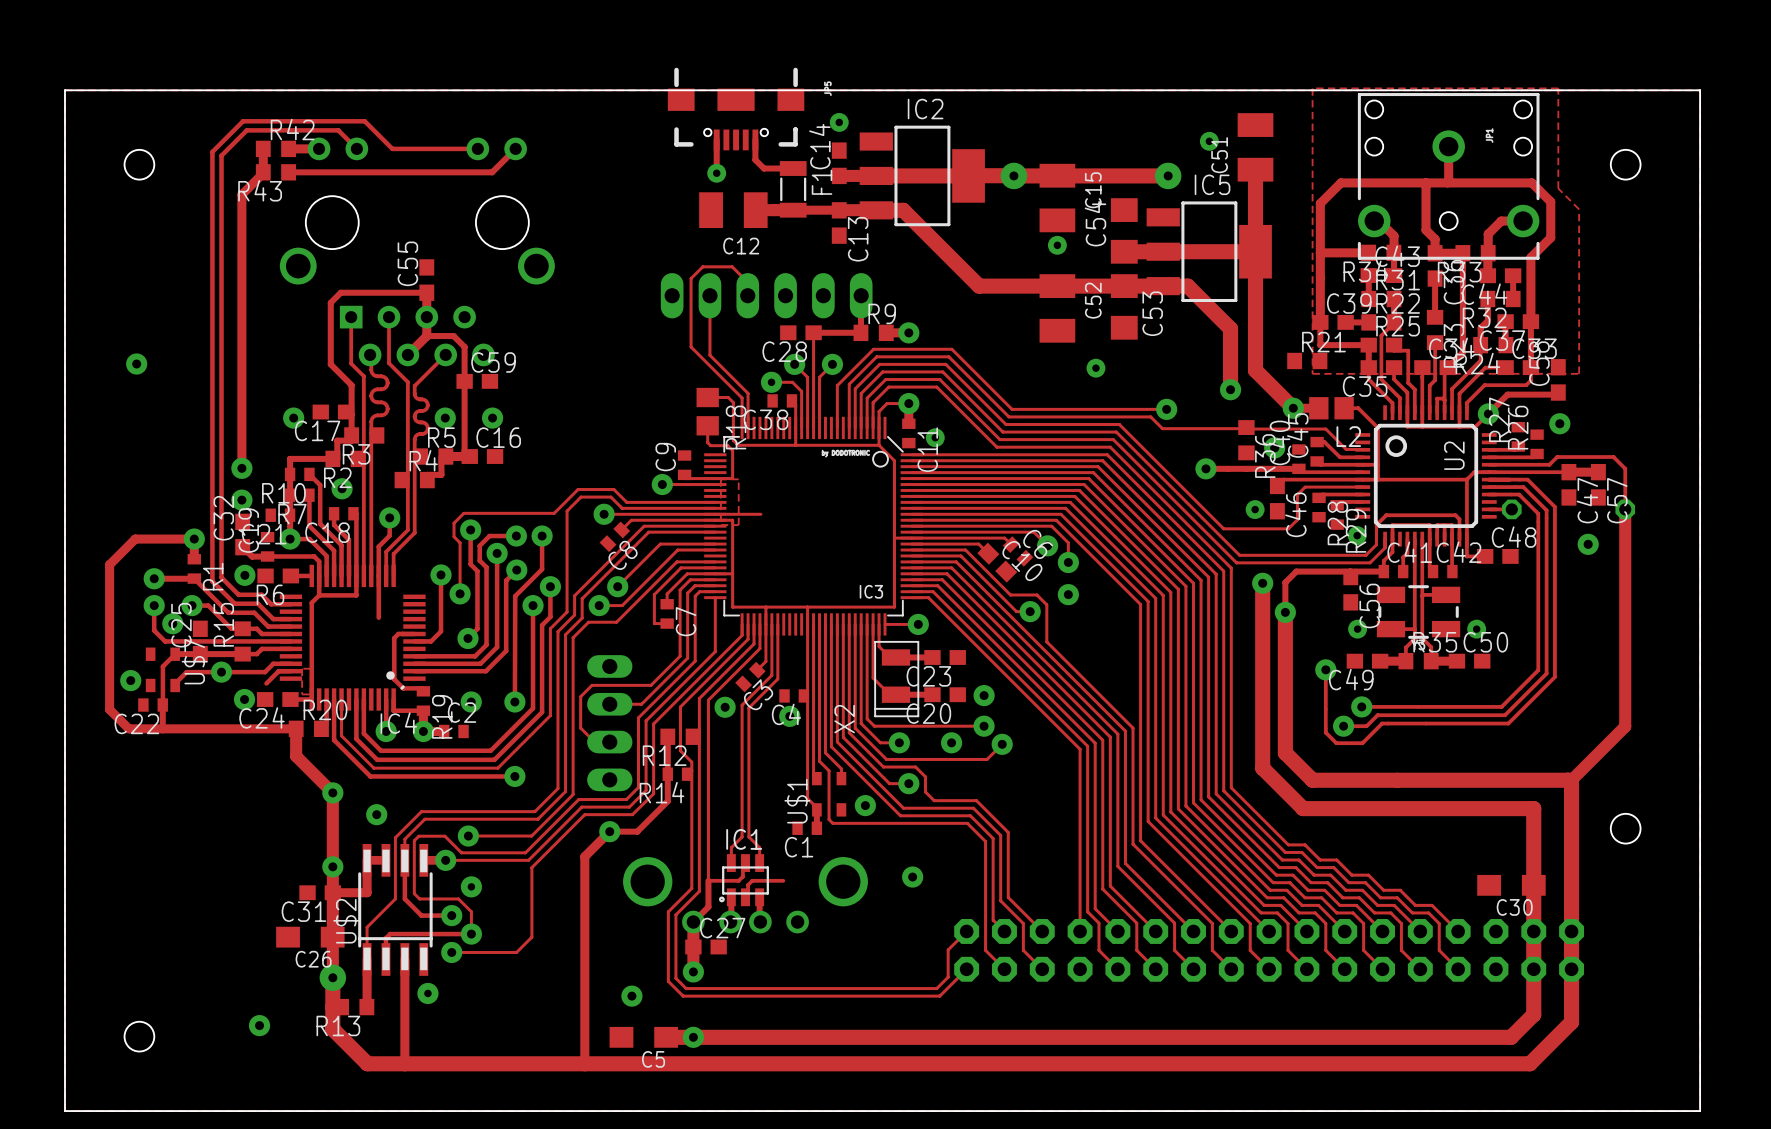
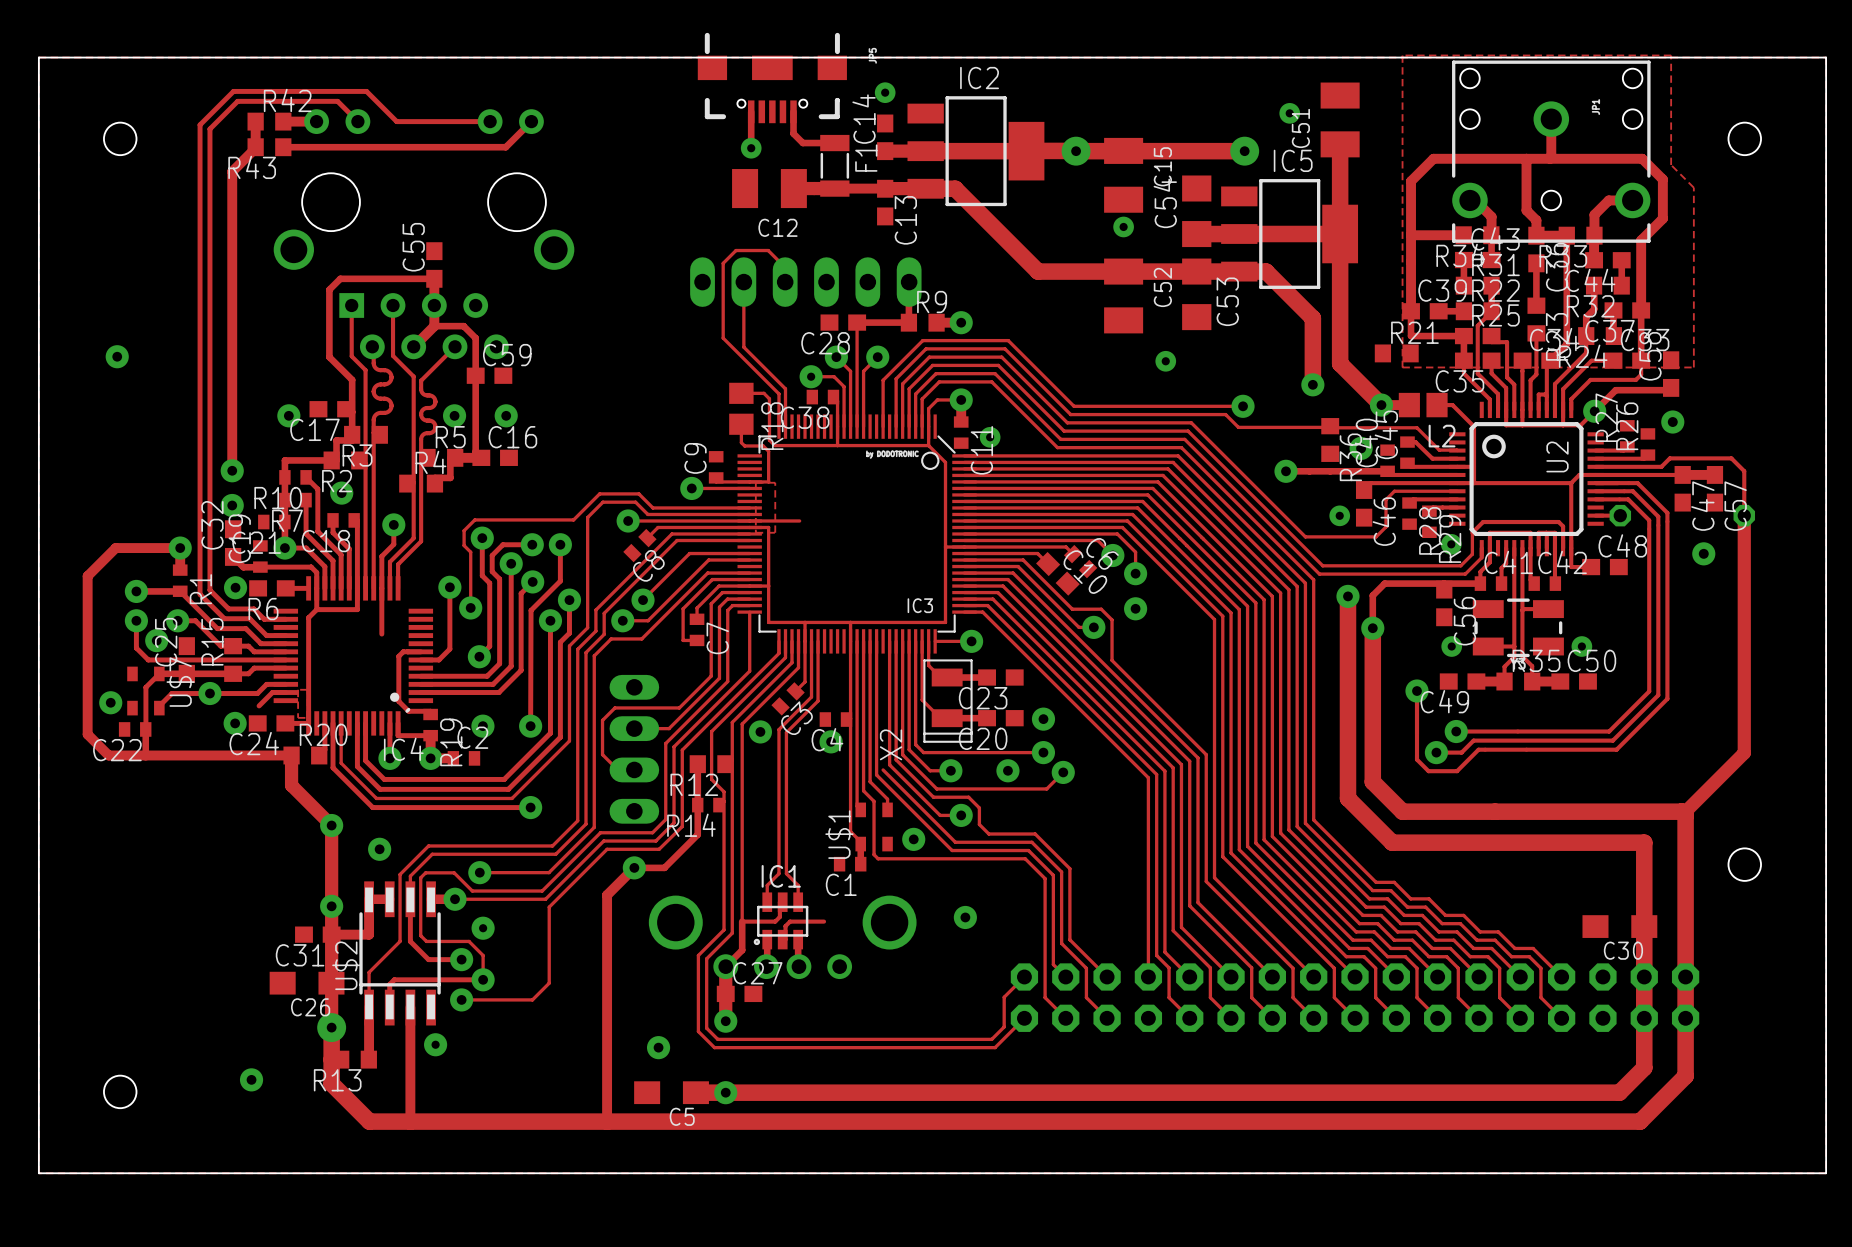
track: (837, 624) (837, 742) -> none

